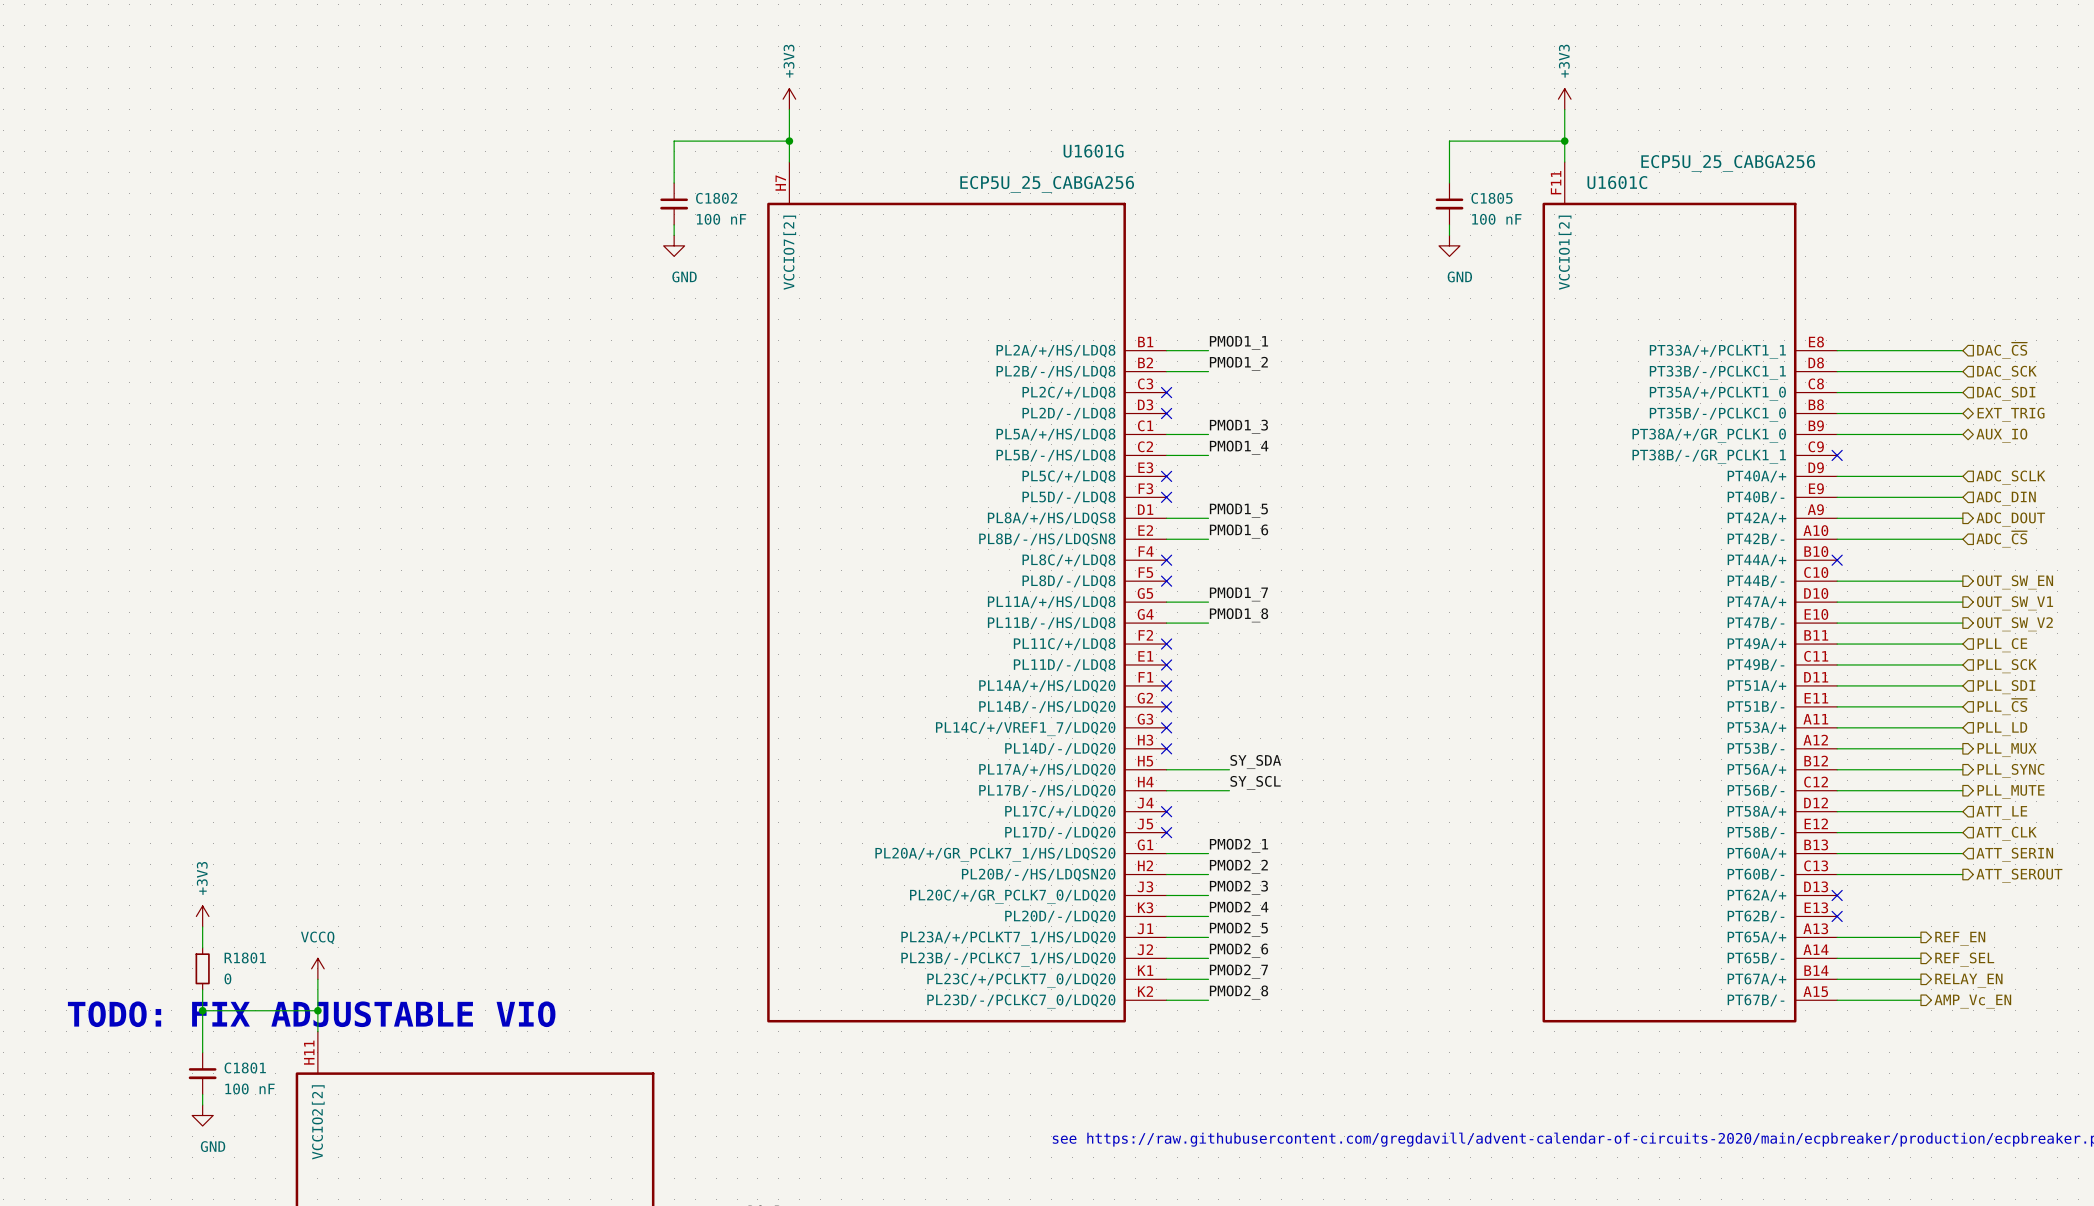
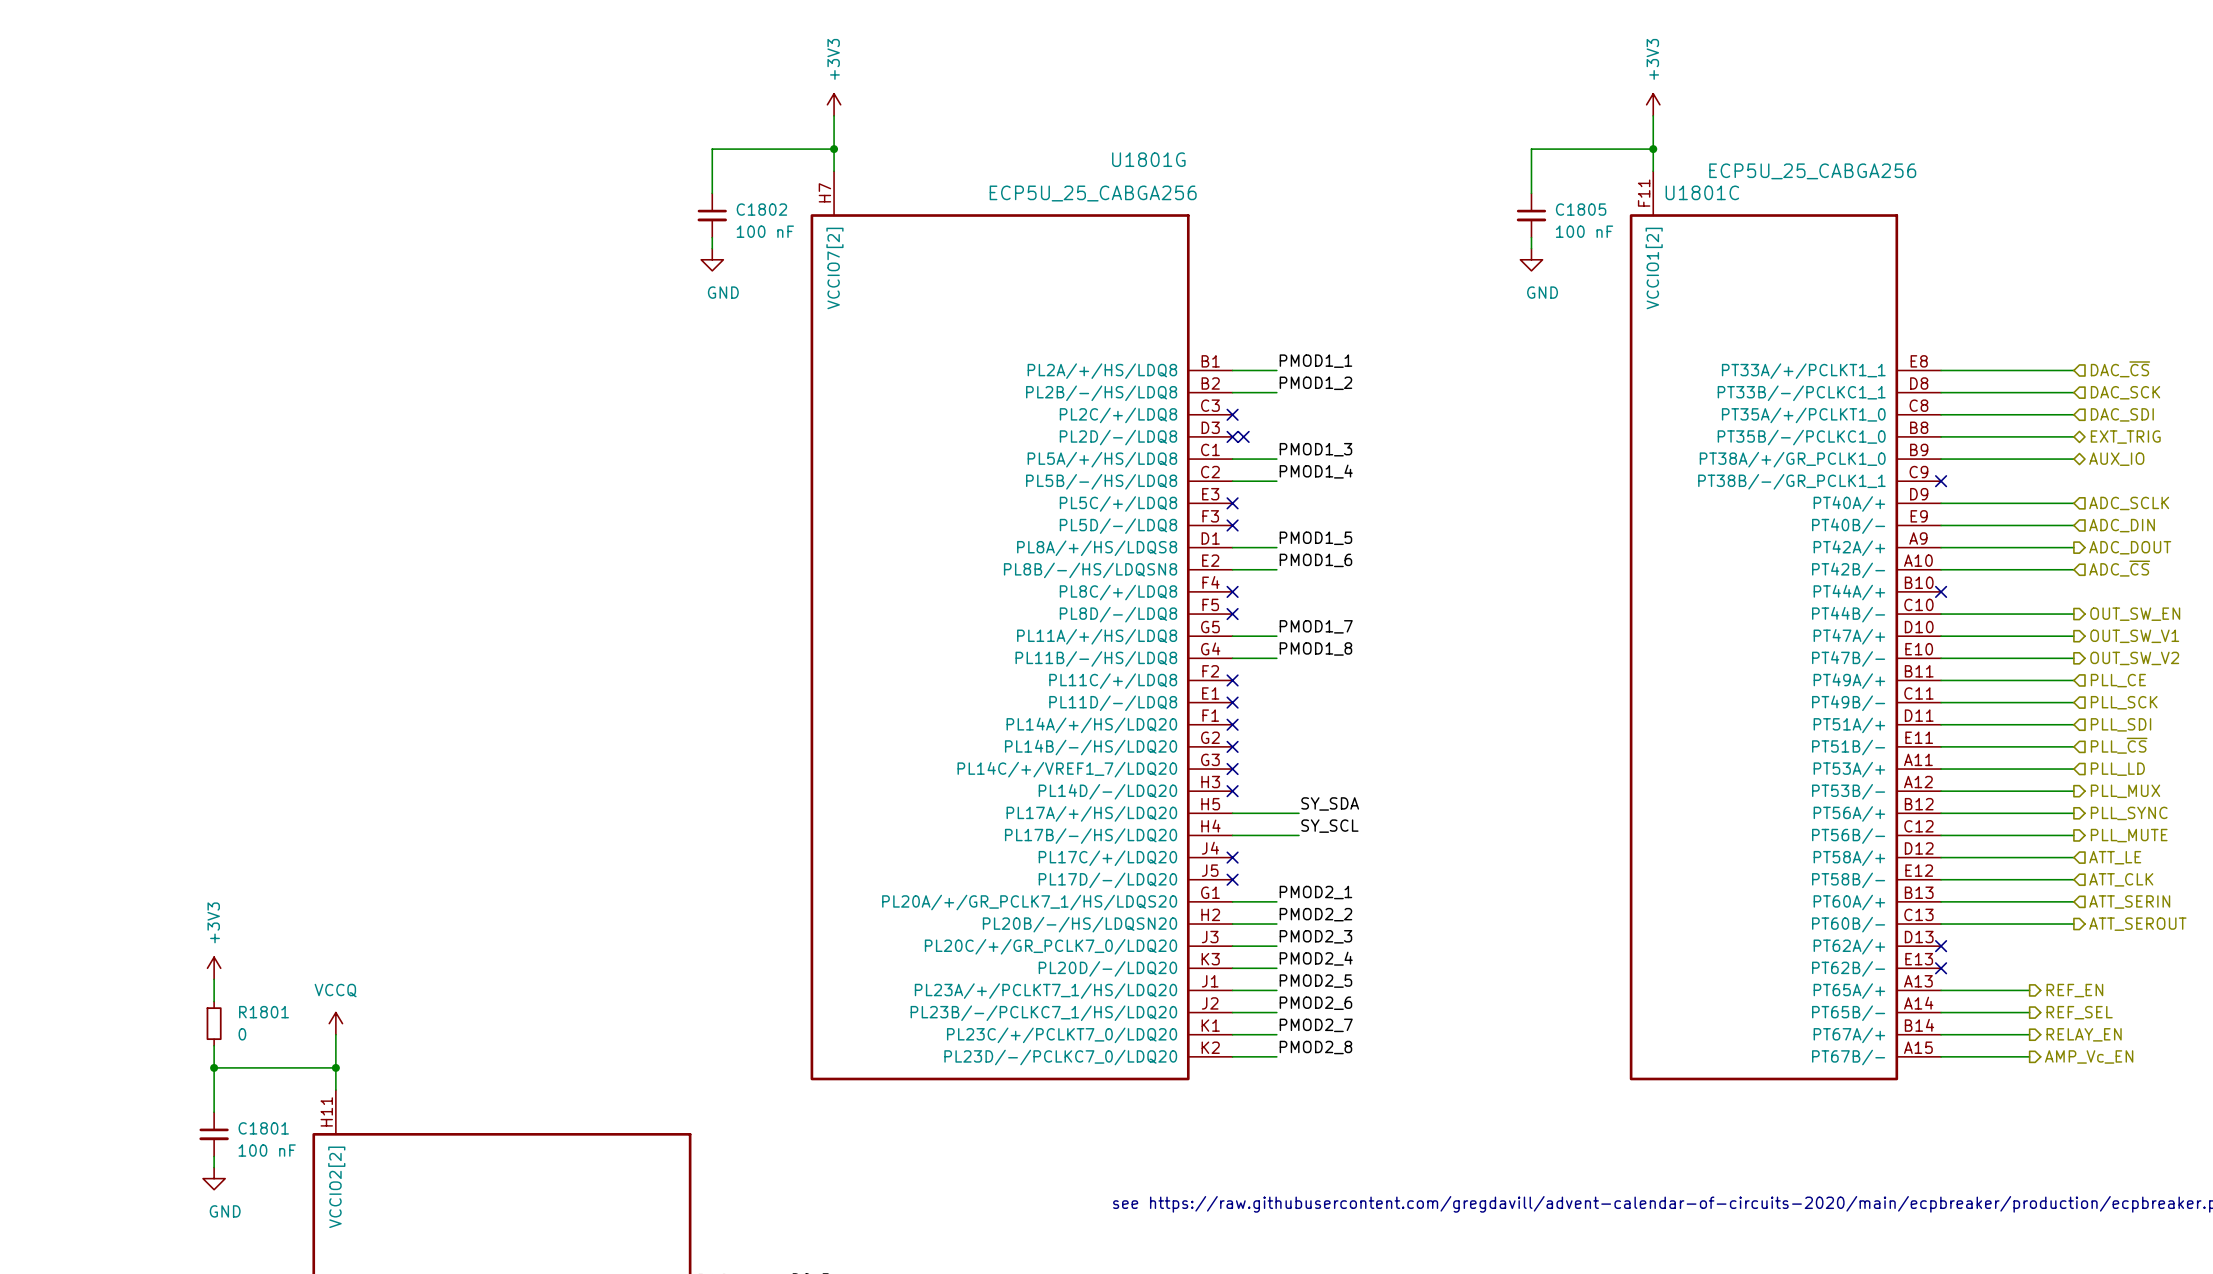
U1601G name: U1601G (1093, 151) -> U1801G (1148, 159)
U1601C name: U1601C (1617, 182) -> U1801C (1702, 192)
no-connect mark: none -> (1243, 436)
text: TODO: FIX ADJUSTABLE VIO (311, 1014) -> none

